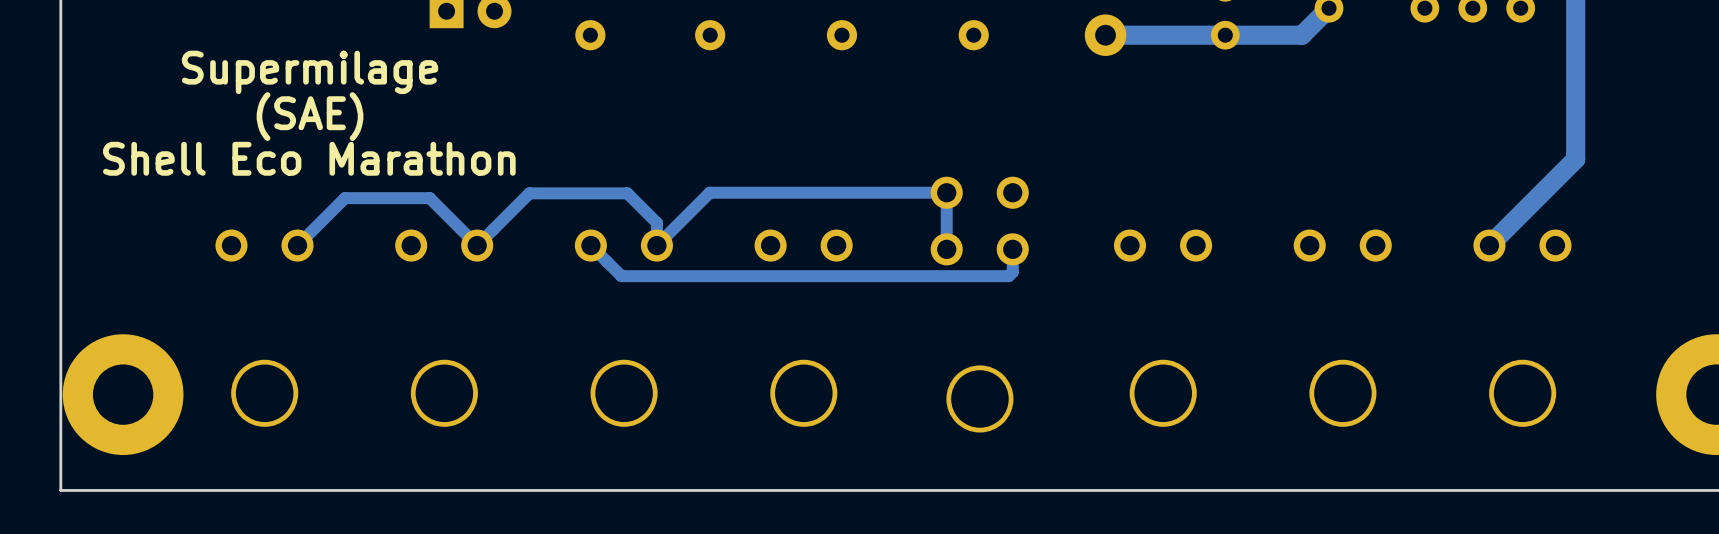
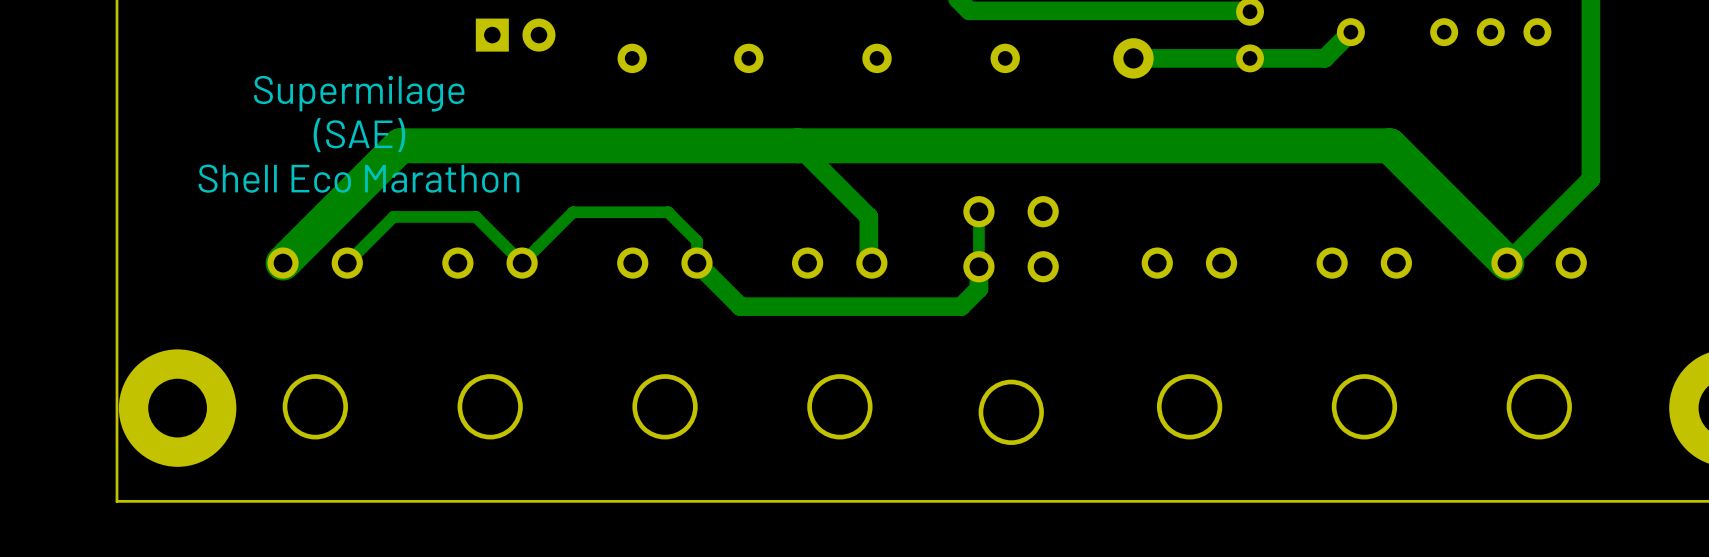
track: none -> (797, 145) (868, 216) (868, 260) (871, 263)
track: (946, 192) (709, 192) (656, 245) -> (978, 266) (978, 288) (961, 306) (740, 306) (696, 263)
track: (590, 245) (621, 276) (1008, 276) (1012, 272) (1012, 249) -> none
track: none -> (1506, 263) (1389, 145) (400, 145) (283, 263)

